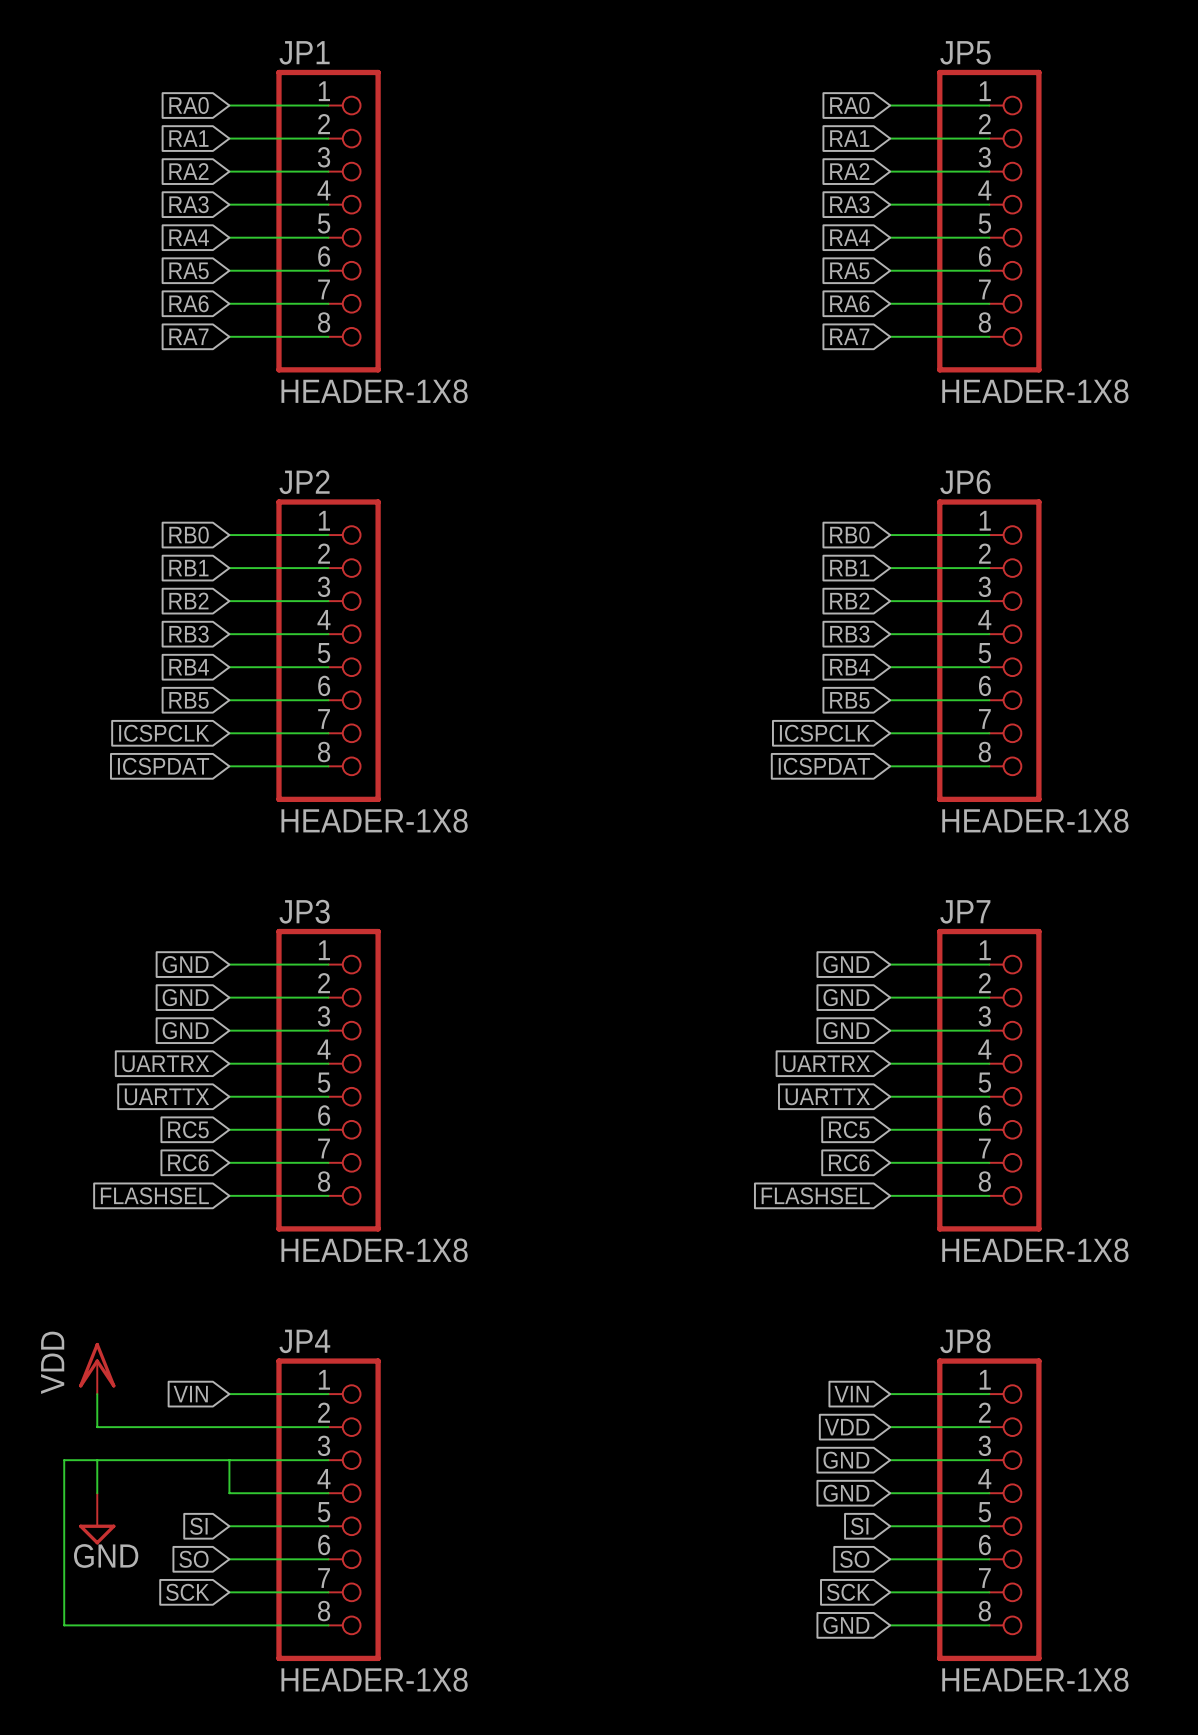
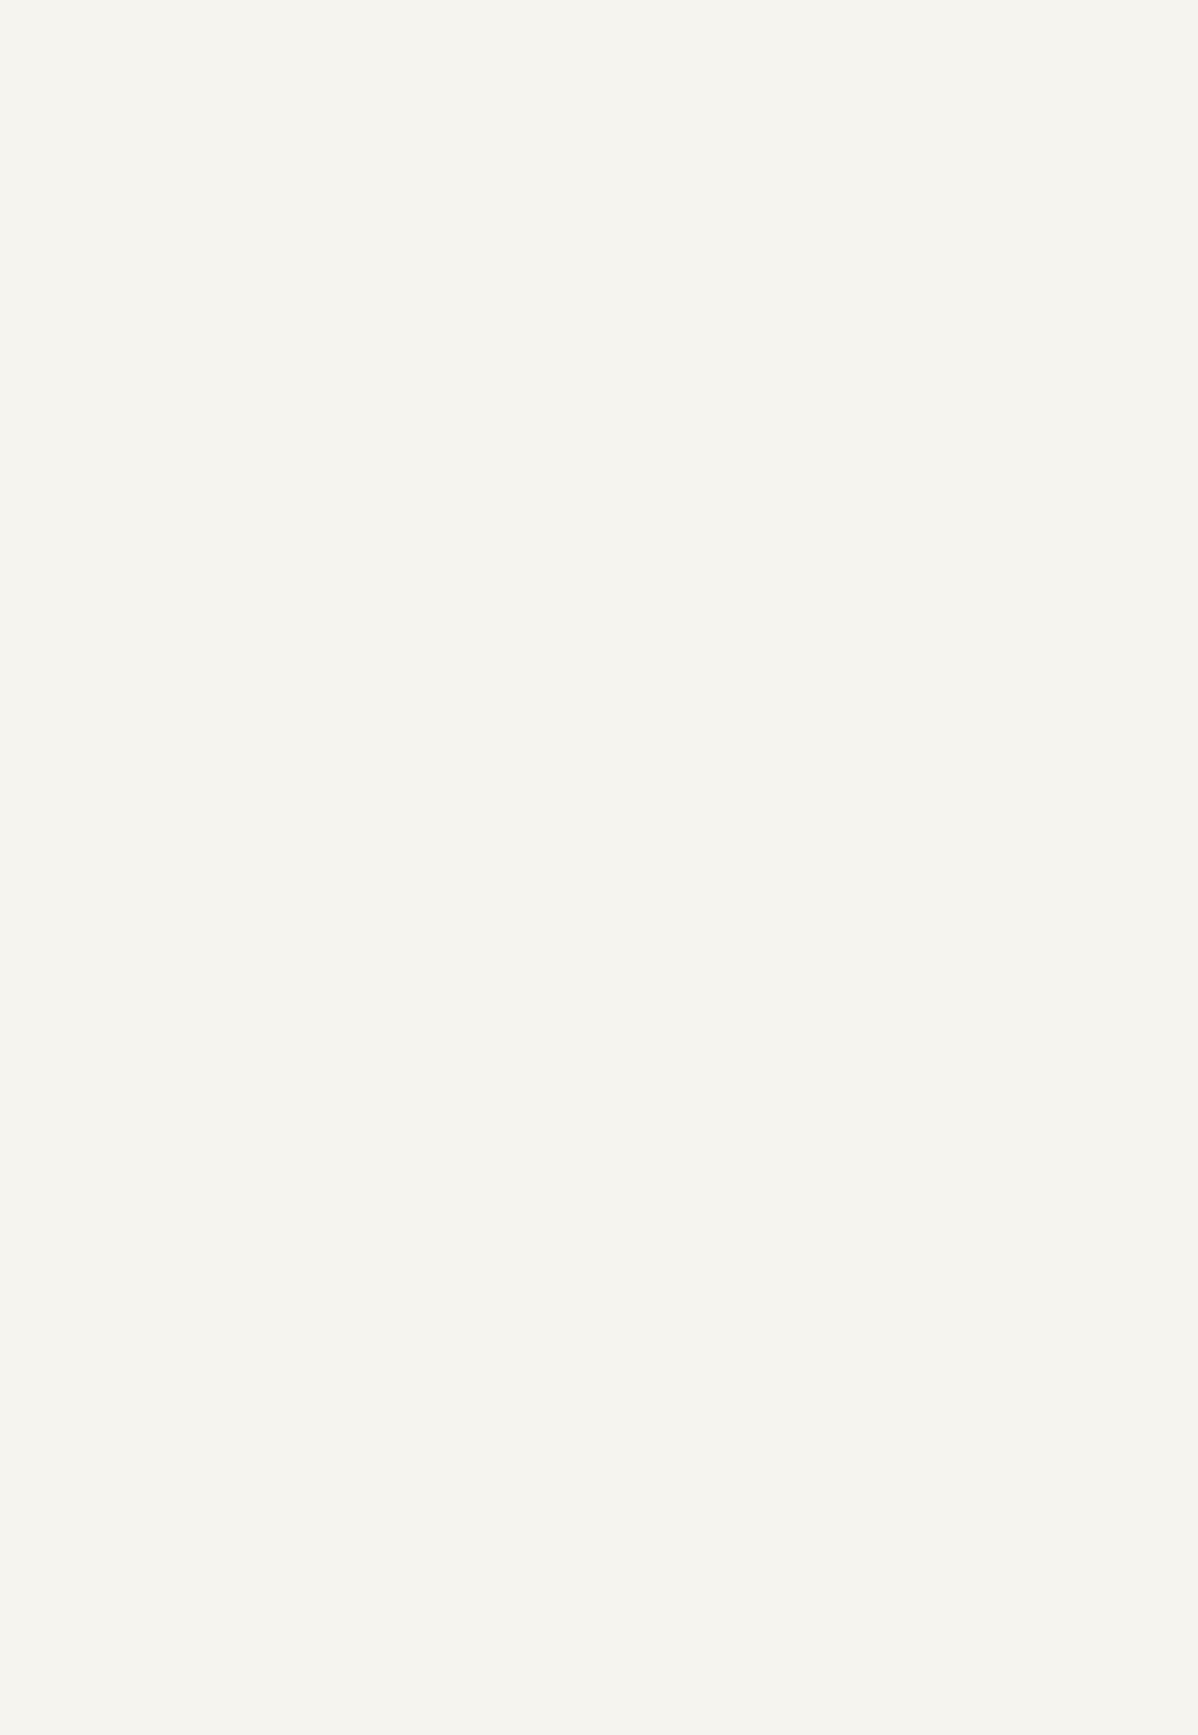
global label: RA0 (189, 105) -> none
wire: (229, 105) (328, 105) -> none
global label: RA0 (849, 105) -> none
wire: (890, 105) (989, 105) -> none
global label: RA1 (188, 138) -> none
wire: (229, 138) (328, 138) -> none
global label: RA1 (849, 138) -> none
wire: (890, 138) (989, 138) -> none
global label: RA2 (188, 171) -> none
wire: (229, 171) (328, 171) -> none
global label: RA2 (849, 171) -> none
wire: (890, 171) (989, 171) -> none
global label: RA3 (188, 204) -> none
wire: (229, 204) (328, 204) -> none
global label: RA3 (849, 204) -> none
wire: (890, 204) (989, 204) -> none
JP1: HEADER-1X8 (328, 221) -> none
JP5: HEADER-1X8 (989, 221) -> none
global label: RA4 (189, 237) -> none
wire: (229, 237) (328, 237) -> none
global label: RA4 (849, 237) -> none
wire: (890, 237) (989, 237) -> none
global label: RA5 (189, 270) -> none
wire: (229, 270) (328, 270) -> none
global label: RA5 (849, 270) -> none
wire: (890, 270) (989, 270) -> none
global label: RA6 (188, 303) -> none
wire: (229, 303) (328, 303) -> none
global label: RA6 (849, 303) -> none
wire: (890, 303) (989, 303) -> none
global label: RA7 (188, 336) -> none
wire: (229, 336) (328, 336) -> none
global label: RA7 (849, 336) -> none
wire: (890, 336) (989, 336) -> none
global label: RB0 (189, 535) -> none
wire: (229, 535) (328, 535) -> none
global label: RB0 (849, 535) -> none
wire: (890, 535) (989, 535) -> none
global label: RB1 (188, 568) -> none
wire: (229, 568) (328, 568) -> none
global label: RB1 (849, 568) -> none
wire: (890, 568) (989, 568) -> none
global label: RB2 (188, 601) -> none
wire: (229, 601) (328, 601) -> none
global label: RB2 (849, 601) -> none
wire: (890, 601) (989, 601) -> none
global label: RB3 (188, 634) -> none
wire: (229, 634) (328, 634) -> none
global label: RB3 (849, 634) -> none
wire: (890, 634) (989, 634) -> none
JP2: HEADER-1X8 (328, 650) -> none
JP6: HEADER-1X8 (989, 650) -> none
global label: RB4 (189, 667) -> none
wire: (229, 667) (328, 667) -> none
global label: RB4 (849, 667) -> none
wire: (890, 667) (989, 667) -> none
global label: RB5 (189, 700) -> none
wire: (229, 700) (328, 700) -> none
global label: RB5 (849, 700) -> none
wire: (890, 700) (989, 700) -> none
global label: ICSPCLK (164, 733) -> none
wire: (229, 733) (328, 733) -> none
global label: ICSPCLK (825, 733) -> none
wire: (890, 733) (989, 733) -> none
global label: ICSPDAT (163, 766) -> none
wire: (229, 766) (328, 766) -> none
global label: ICSPDAT (824, 766) -> none
wire: (890, 766) (989, 766) -> none
global label: GND (185, 964) -> none
wire: (229, 964) (328, 964) -> none
global label: GND (846, 964) -> none
wire: (890, 964) (989, 964) -> none
global label: GND (185, 997) -> none
wire: (229, 997) (328, 997) -> none
global label: GND (846, 997) -> none
wire: (890, 997) (989, 997) -> none
global label: GND (185, 1030) -> none
wire: (229, 1030) (328, 1030) -> none
global label: GND (846, 1030) -> none
wire: (890, 1030) (989, 1030) -> none
global label: UARTRX (165, 1063) -> none
wire: (229, 1063) (328, 1063) -> none
global label: UARTRX (826, 1063) -> none
wire: (890, 1063) (989, 1063) -> none
JP3: HEADER-1X8 (328, 1080) -> none
JP7: HEADER-1X8 (989, 1080) -> none
global label: UARTTX (166, 1096) -> none
wire: (229, 1096) (328, 1096) -> none
global label: UARTTX (827, 1096) -> none
wire: (890, 1096) (989, 1096) -> none
global label: RC5 (188, 1129) -> none
wire: (229, 1129) (328, 1129) -> none
global label: RC5 (849, 1129) -> none
wire: (890, 1129) (989, 1129) -> none
global label: RC6 (188, 1162) -> none
wire: (229, 1162) (328, 1162) -> none
global label: RC6 (849, 1162) -> none
wire: (890, 1162) (989, 1162) -> none
global label: FLASHSEL (154, 1195) -> none
wire: (229, 1195) (328, 1195) -> none
global label: FLASHSEL (815, 1195) -> none
wire: (890, 1195) (989, 1195) -> none
power symbol: VDD (97, 1368) -> none
wire: (97, 1394) (97, 1427) (328, 1427) -> none
global label: VIN (190, 1394) -> none
wire: (229, 1394) (328, 1394) -> none
global label: VIN (851, 1394) -> none
wire: (890, 1394) (989, 1394) -> none
global label: VDD (847, 1427) -> none
wire: (890, 1427) (989, 1427) -> none
wire: (97, 1460) (97, 1493) -> none
wire: (229, 1460) (229, 1493) (328, 1493) -> none
wire: (328, 1460) (64, 1460) (64, 1625) (328, 1625) -> none
global label: GND (846, 1460) -> none
wire: (890, 1460) (989, 1460) -> none
global label: GND (846, 1493) -> none
wire: (890, 1493) (989, 1493) -> none
JP4: HEADER-1X8 (328, 1509) -> none
JP8: HEADER-1X8 (989, 1509) -> none
power symbol: GND (97, 1518) -> none
global label: SI (198, 1526) -> none
wire: (229, 1526) (328, 1526) -> none
global label: SI (859, 1526) -> none
wire: (890, 1526) (989, 1526) -> none
global label: SO (193, 1559) -> none
wire: (229, 1559) (328, 1559) -> none
global label: SO (854, 1559) -> none
wire: (890, 1559) (989, 1559) -> none
global label: SCK (187, 1592) -> none
wire: (229, 1592) (328, 1592) -> none
global label: SCK (848, 1592) -> none
wire: (890, 1592) (989, 1592) -> none
global label: GND (846, 1625) -> none
wire: (890, 1625) (989, 1625) -> none

